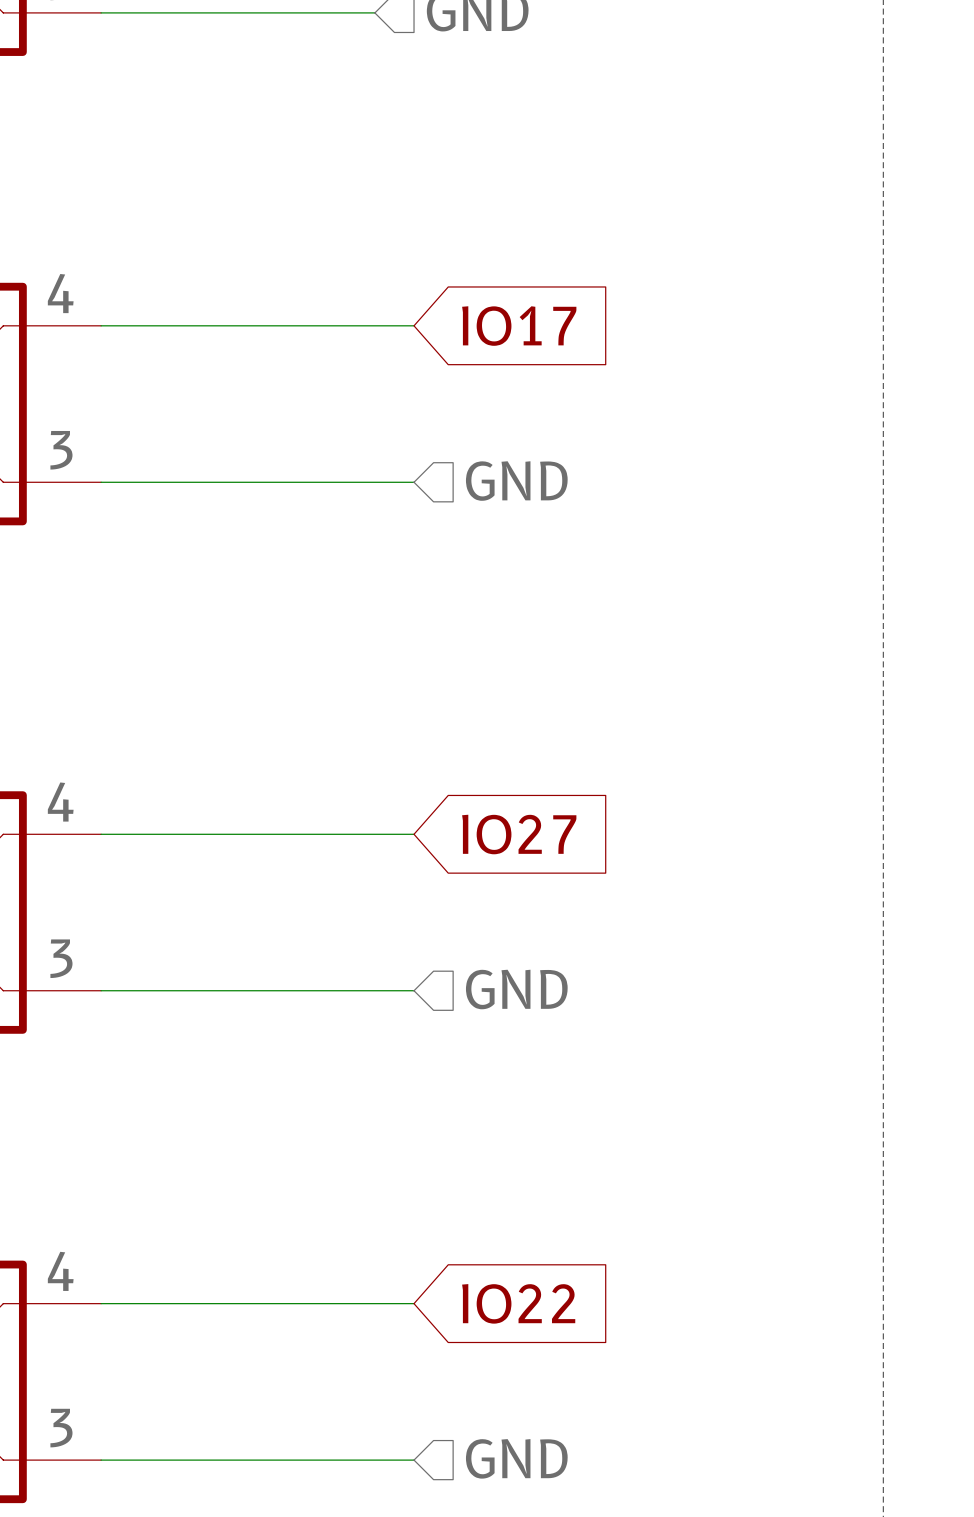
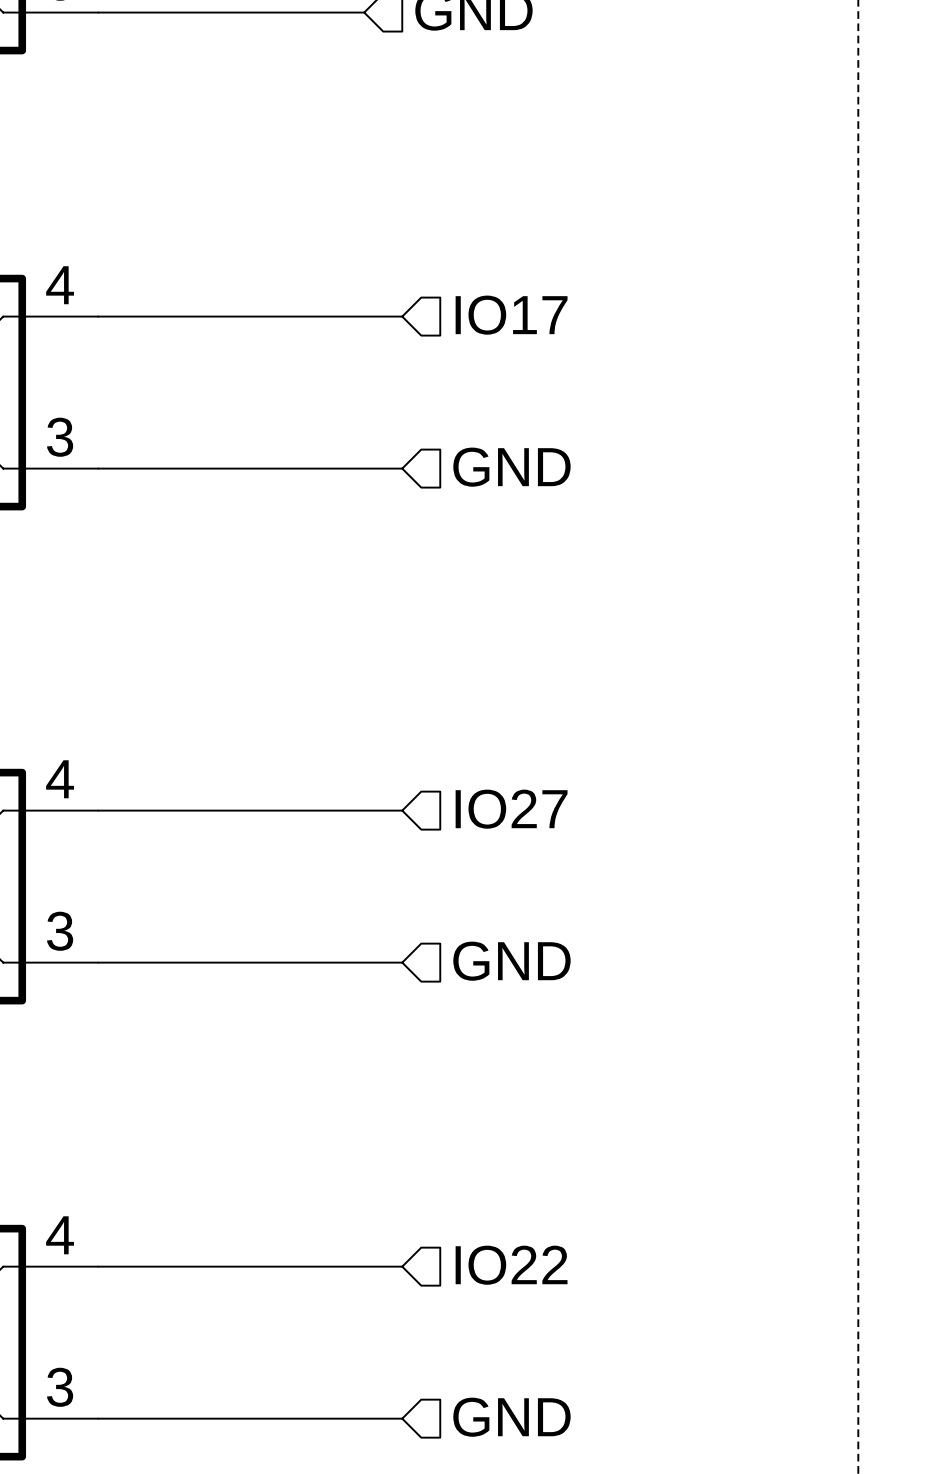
hierarchical label: none -> IO17 (511, 315)
global label: IO17 (519, 326) -> none
hierarchical label: none -> IO27 (511, 809)
global label: IO27 (519, 834) -> none
hierarchical label: none -> IO22 (511, 1265)
global label: IO22 (518, 1303) -> none

